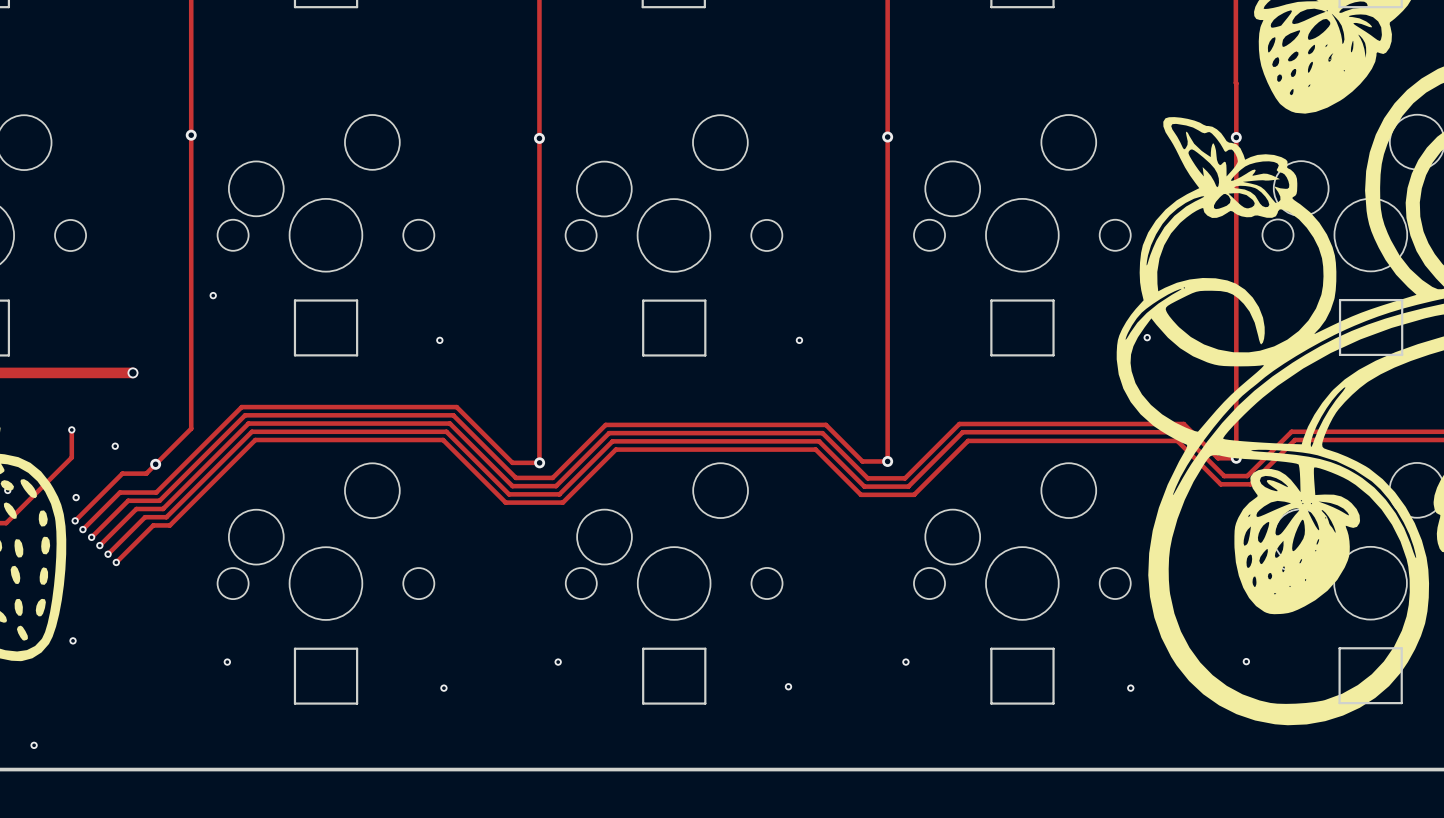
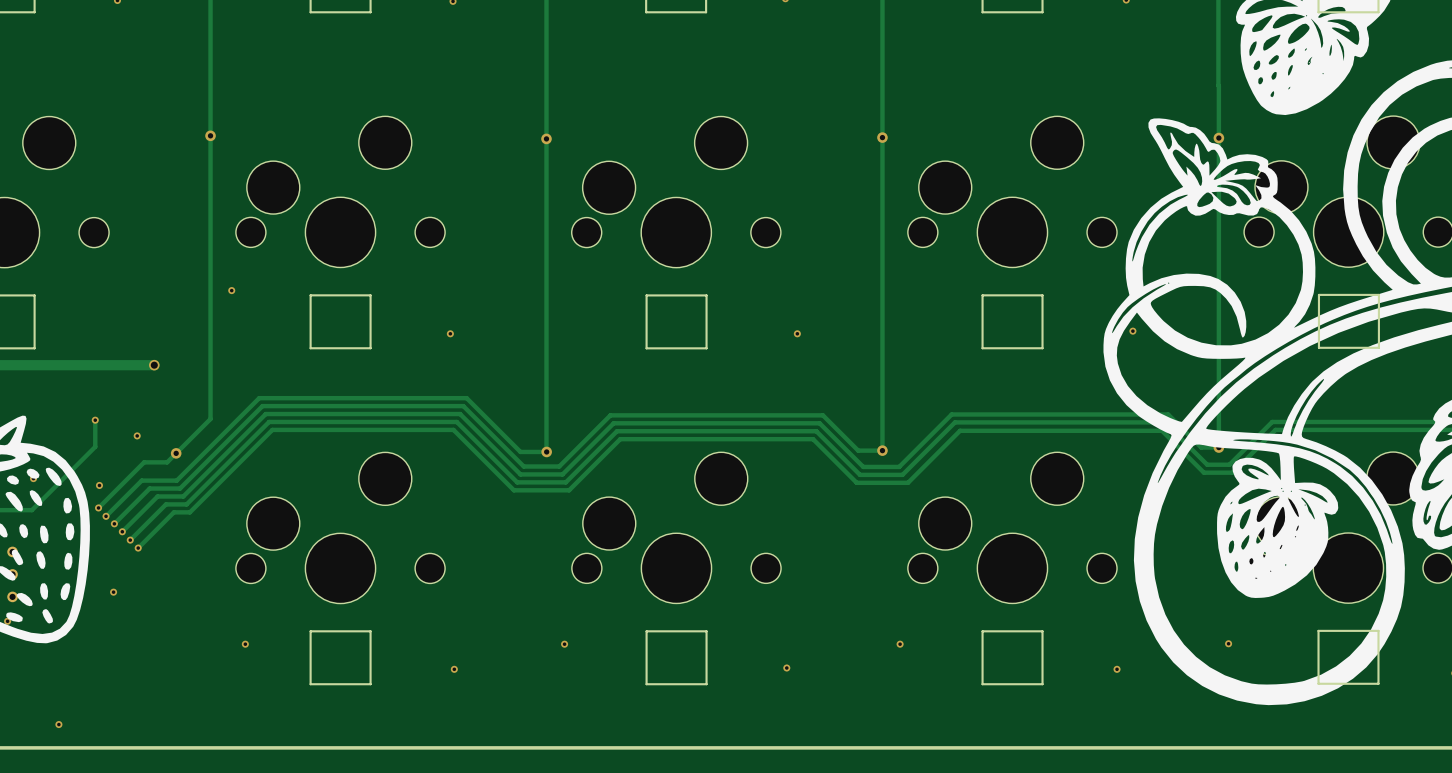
via position: (73, 640) -> (113, 592)

